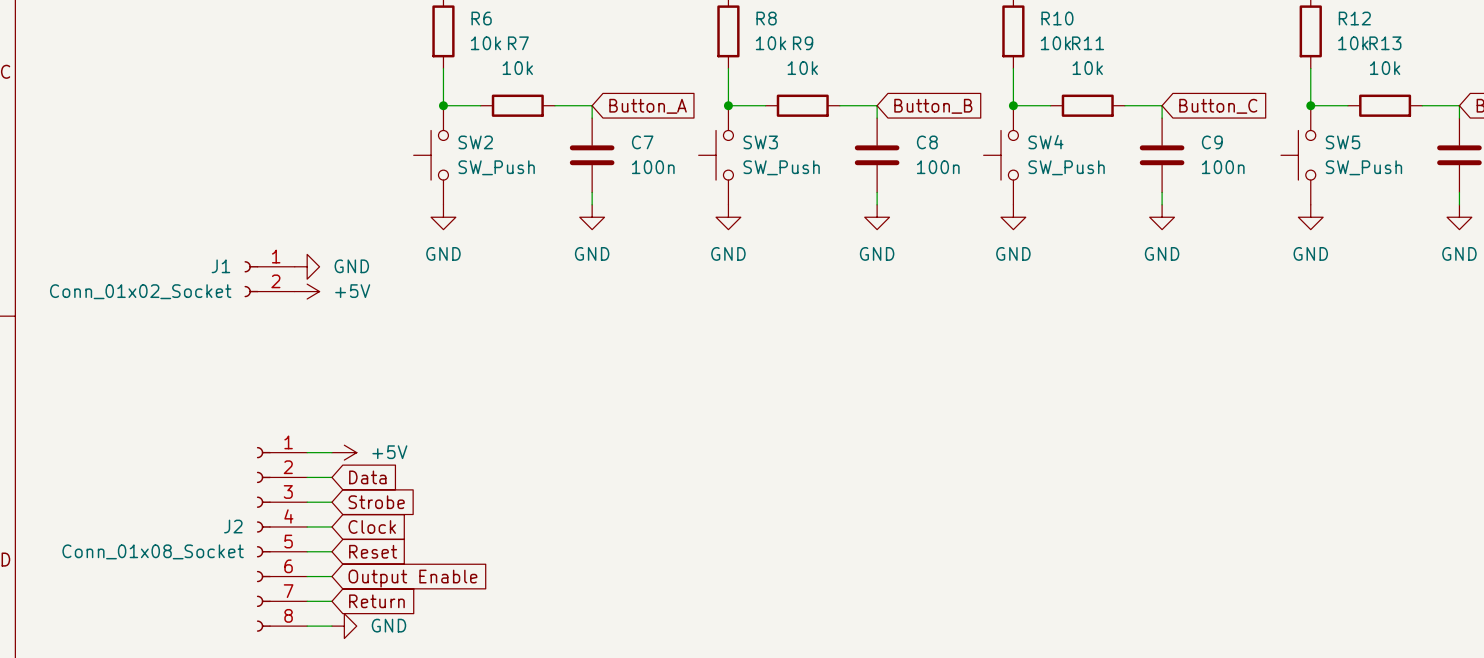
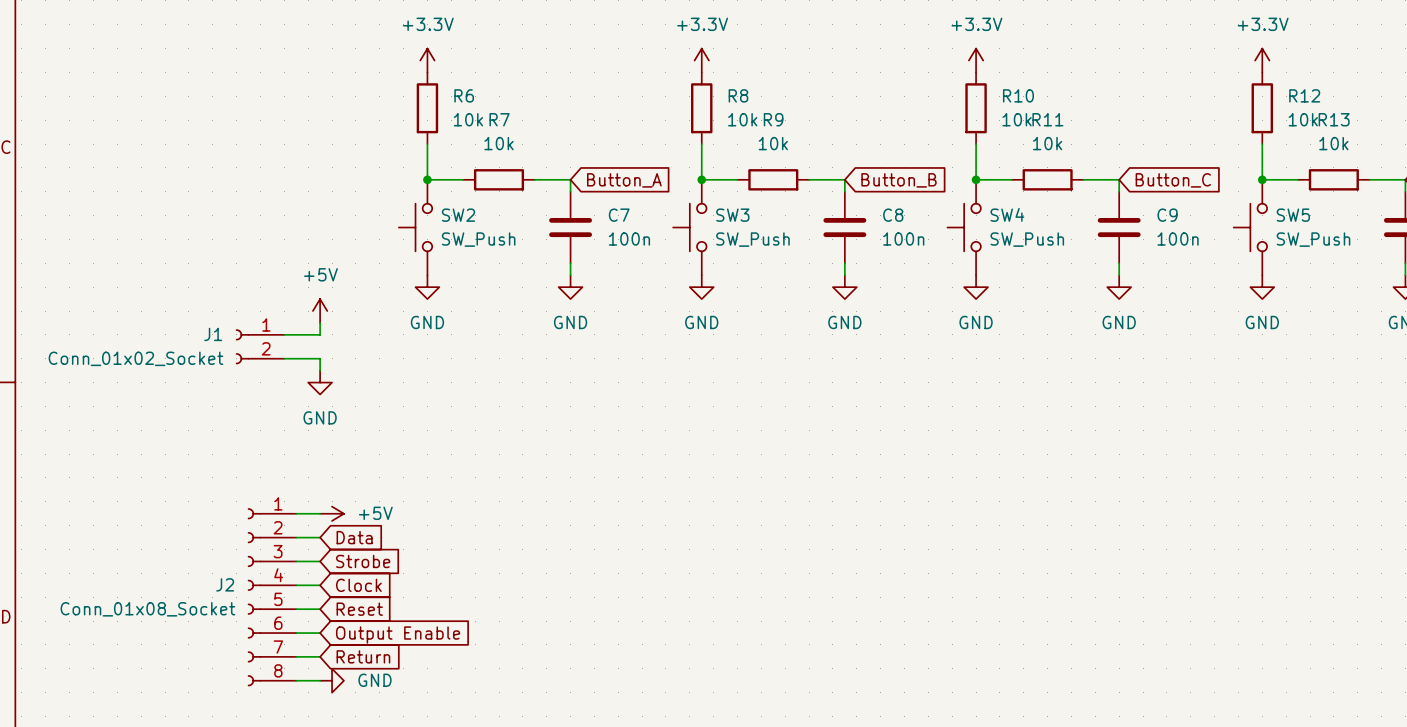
wire: none -> (320, 322) (320, 334) (284, 334)
power symbol rotation: 0° (307, 266) -> 90° clockwise (320, 382)
power symbol position: GND (307, 266) -> GND (320, 382)
wire: none -> (284, 358) (320, 358) (320, 370)
power symbol rotation: 0° (307, 291) -> 90° counterclockwise (320, 311)
power symbol position: +5V (307, 291) -> +5V (320, 311)

